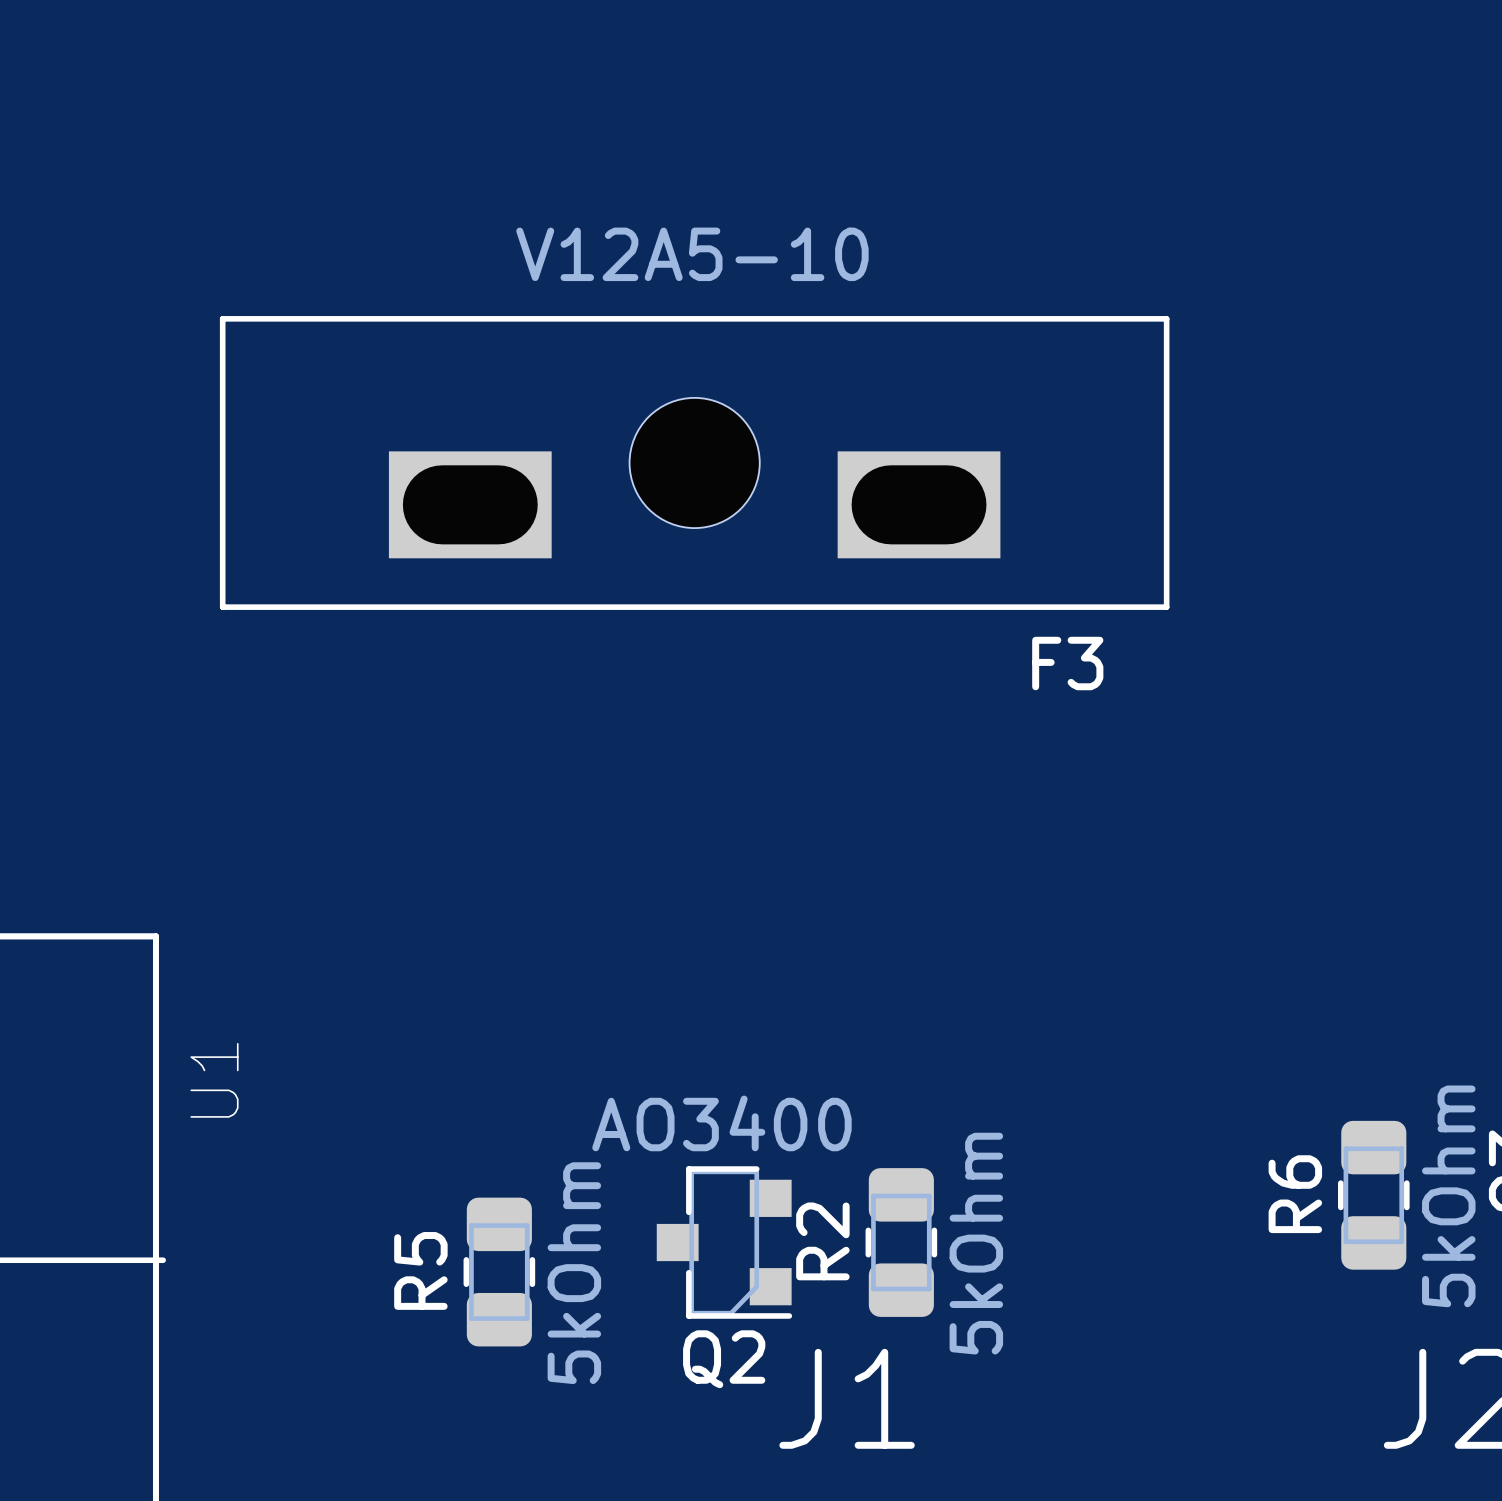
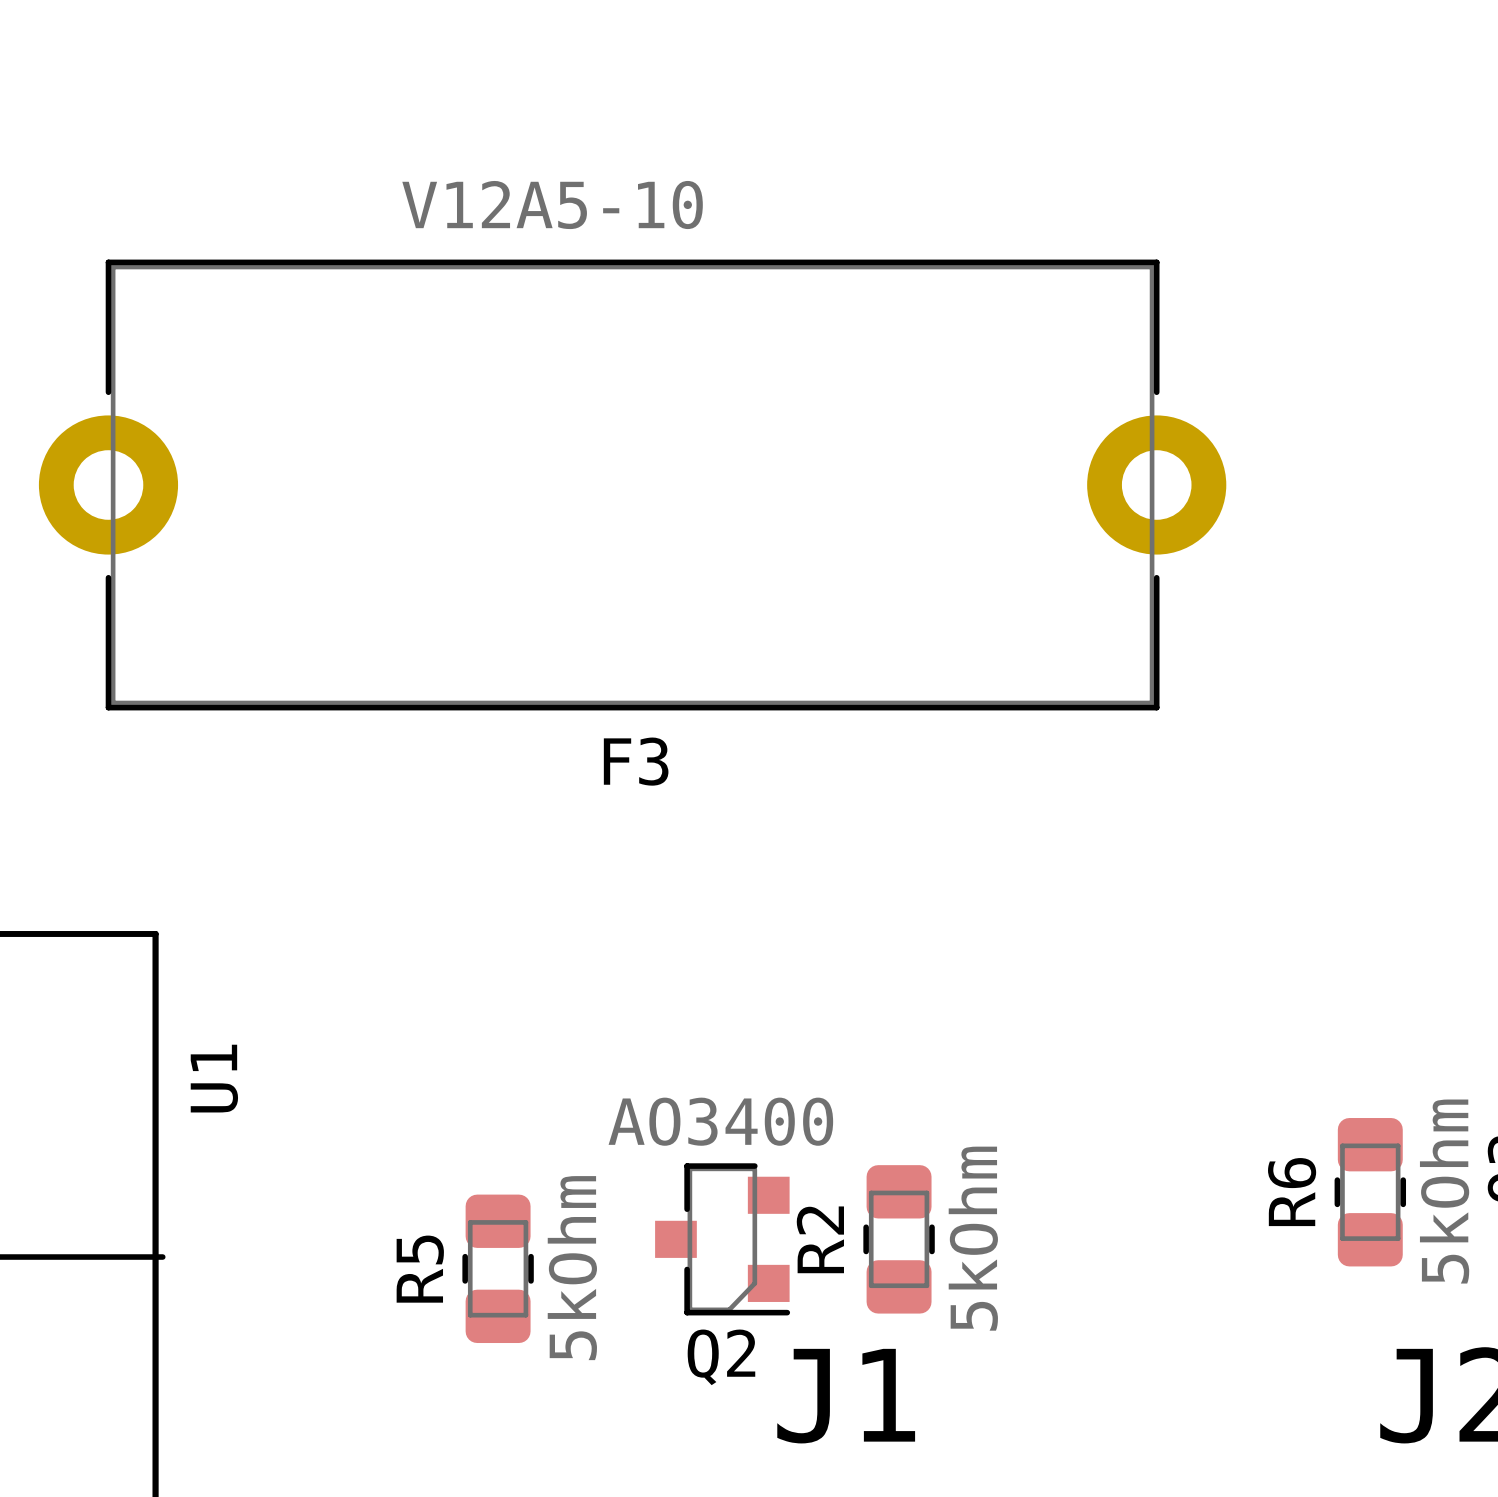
F3 value position: V12A5-10 (692, 254) -> V12A5-10 (552, 205)
F3 footprint: [219, 316, 1170, 610] -> [38, 259, 1227, 711]
F3 name position: F3 (1067, 663) -> F3 (636, 761)

